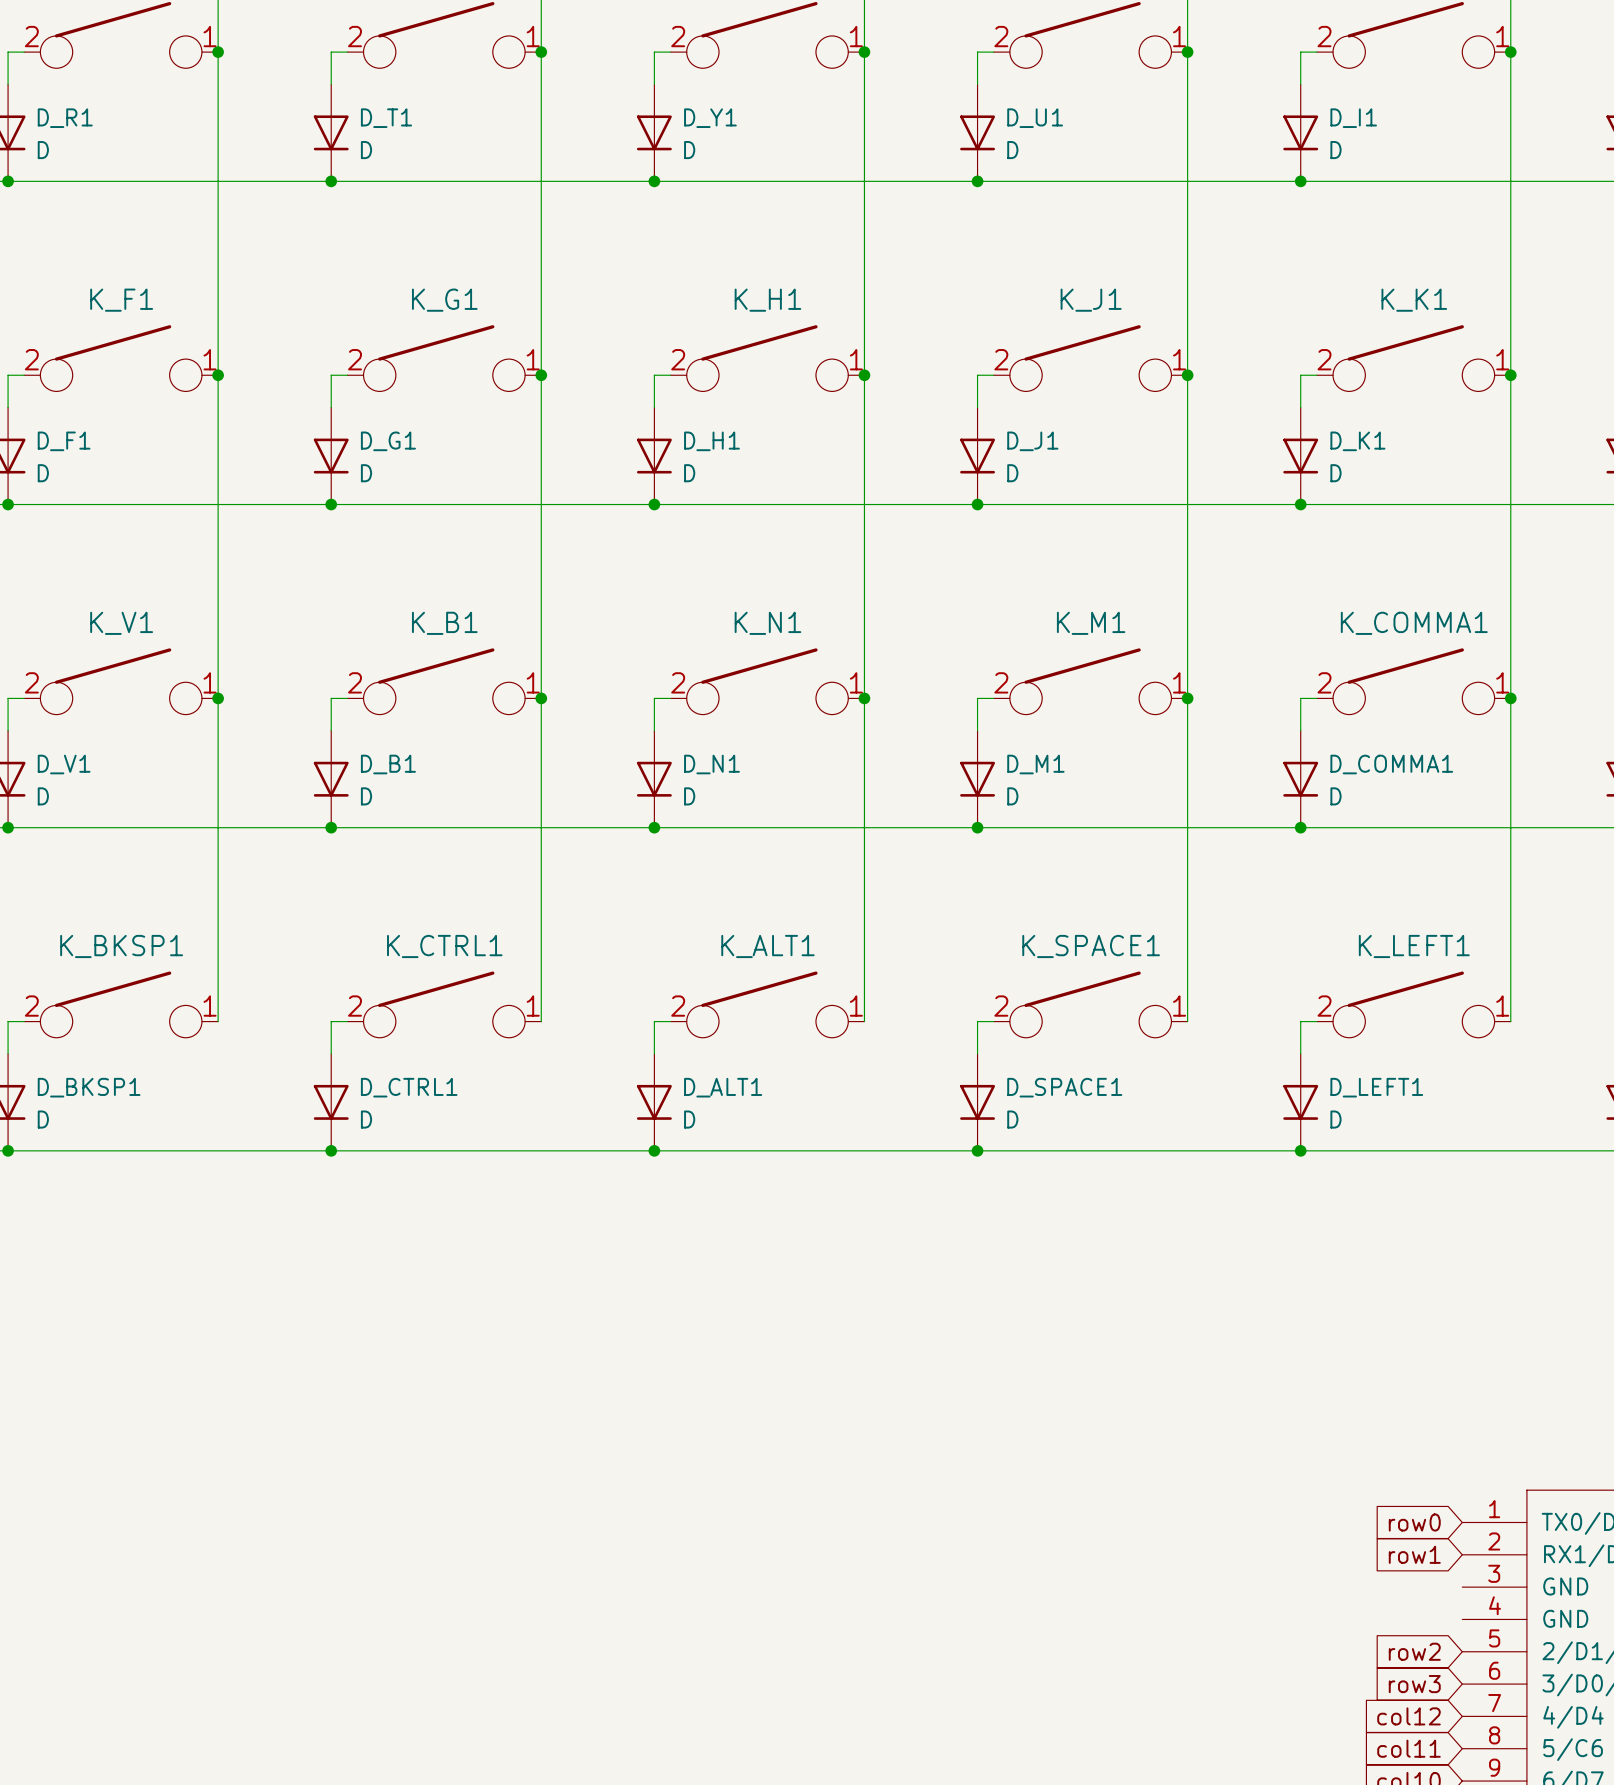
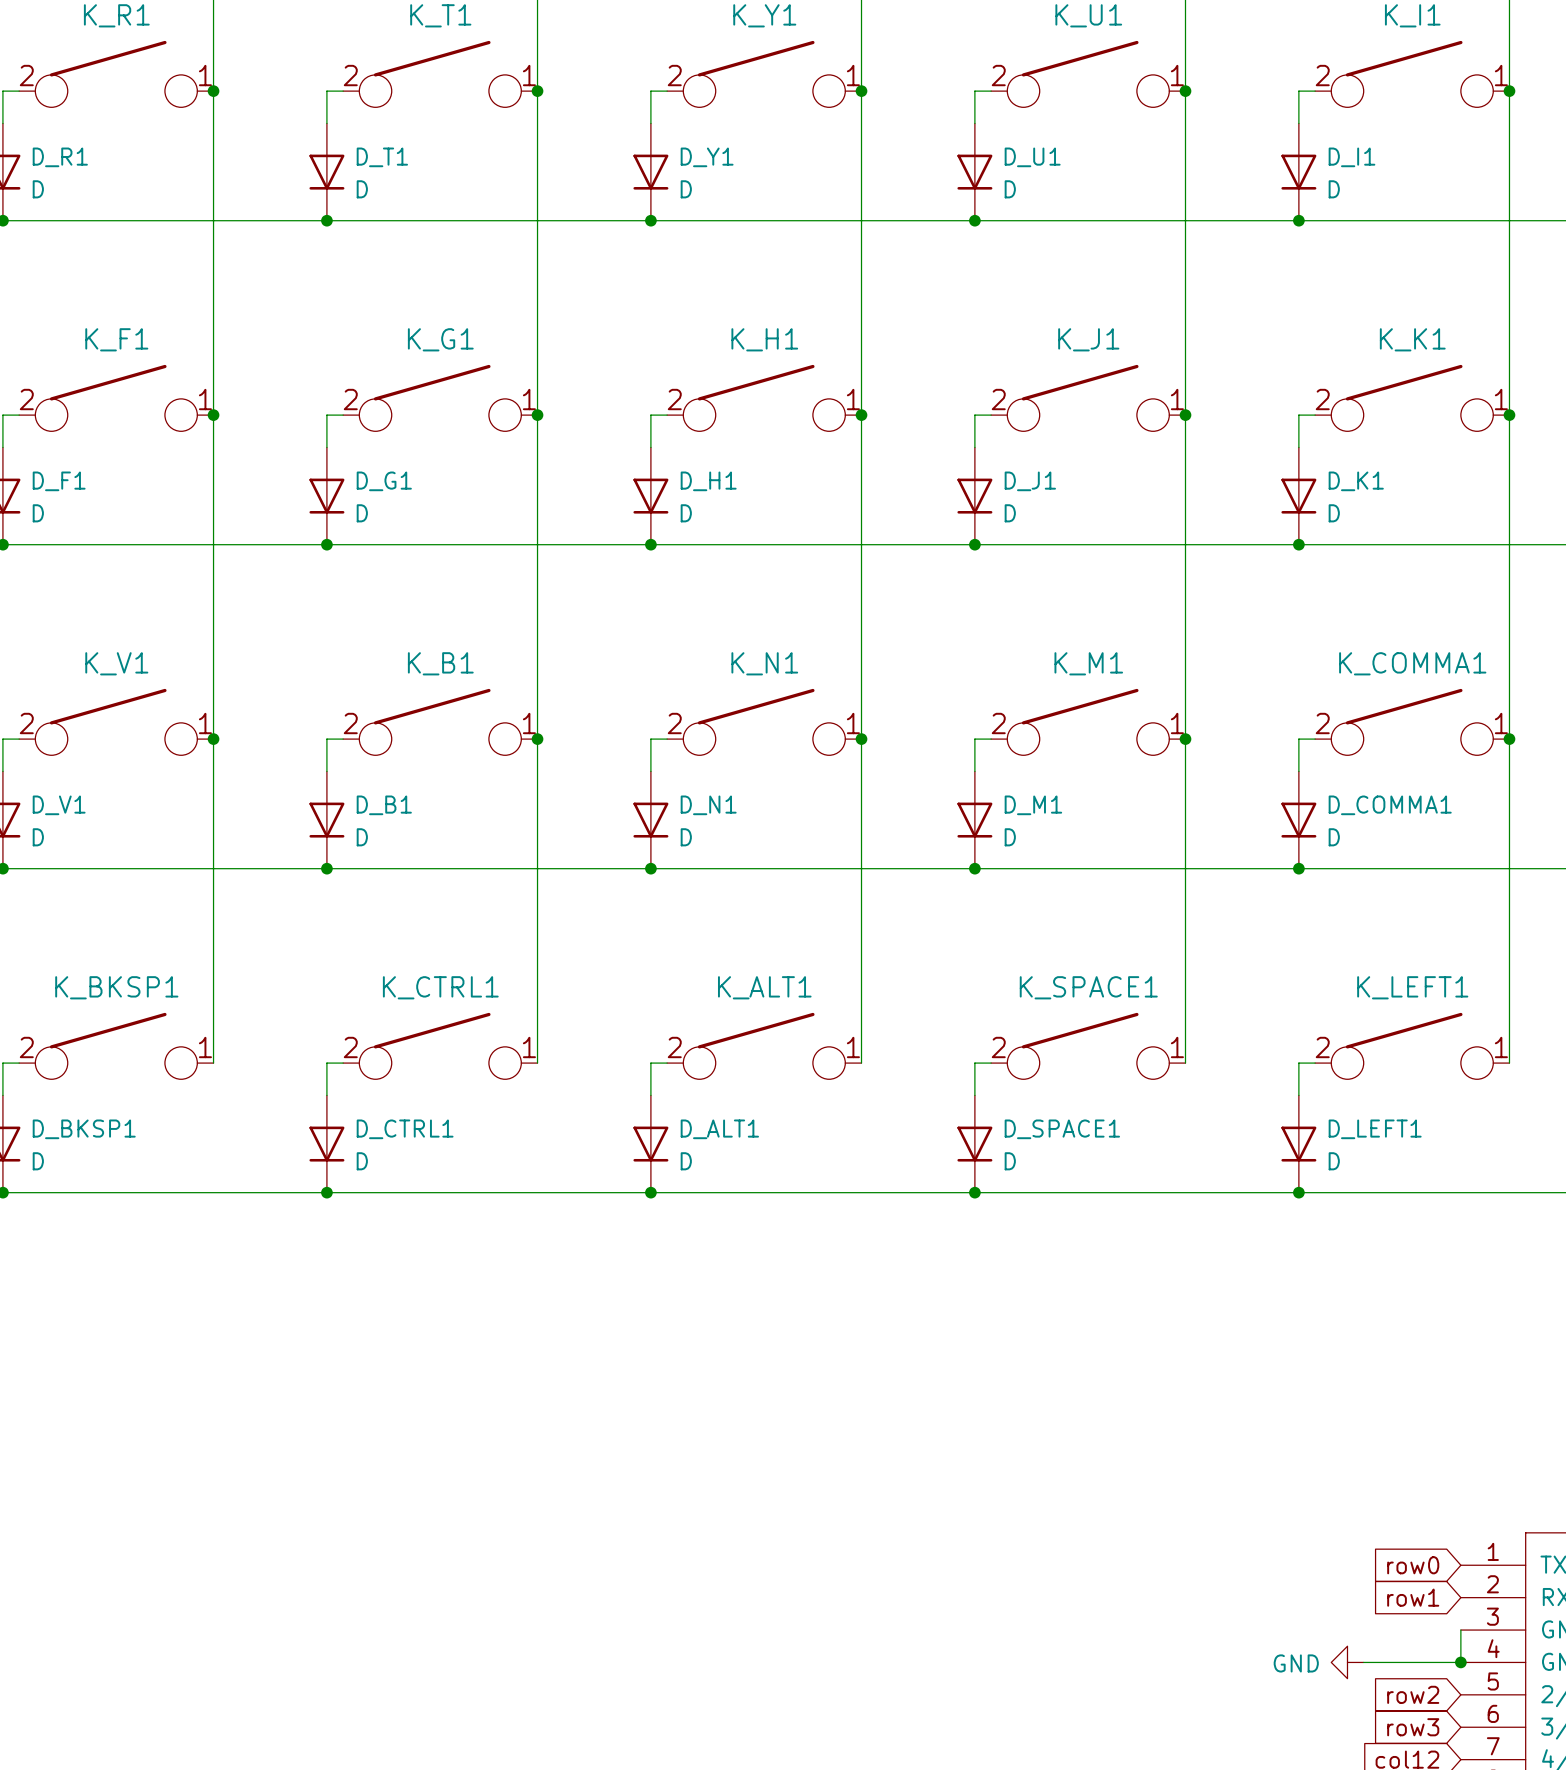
wire: none -> (1460, 1630) (1460, 1662) (1363, 1662)
power symbol: none -> GND (1347, 1662)
junction: none -> (1460, 1662)

